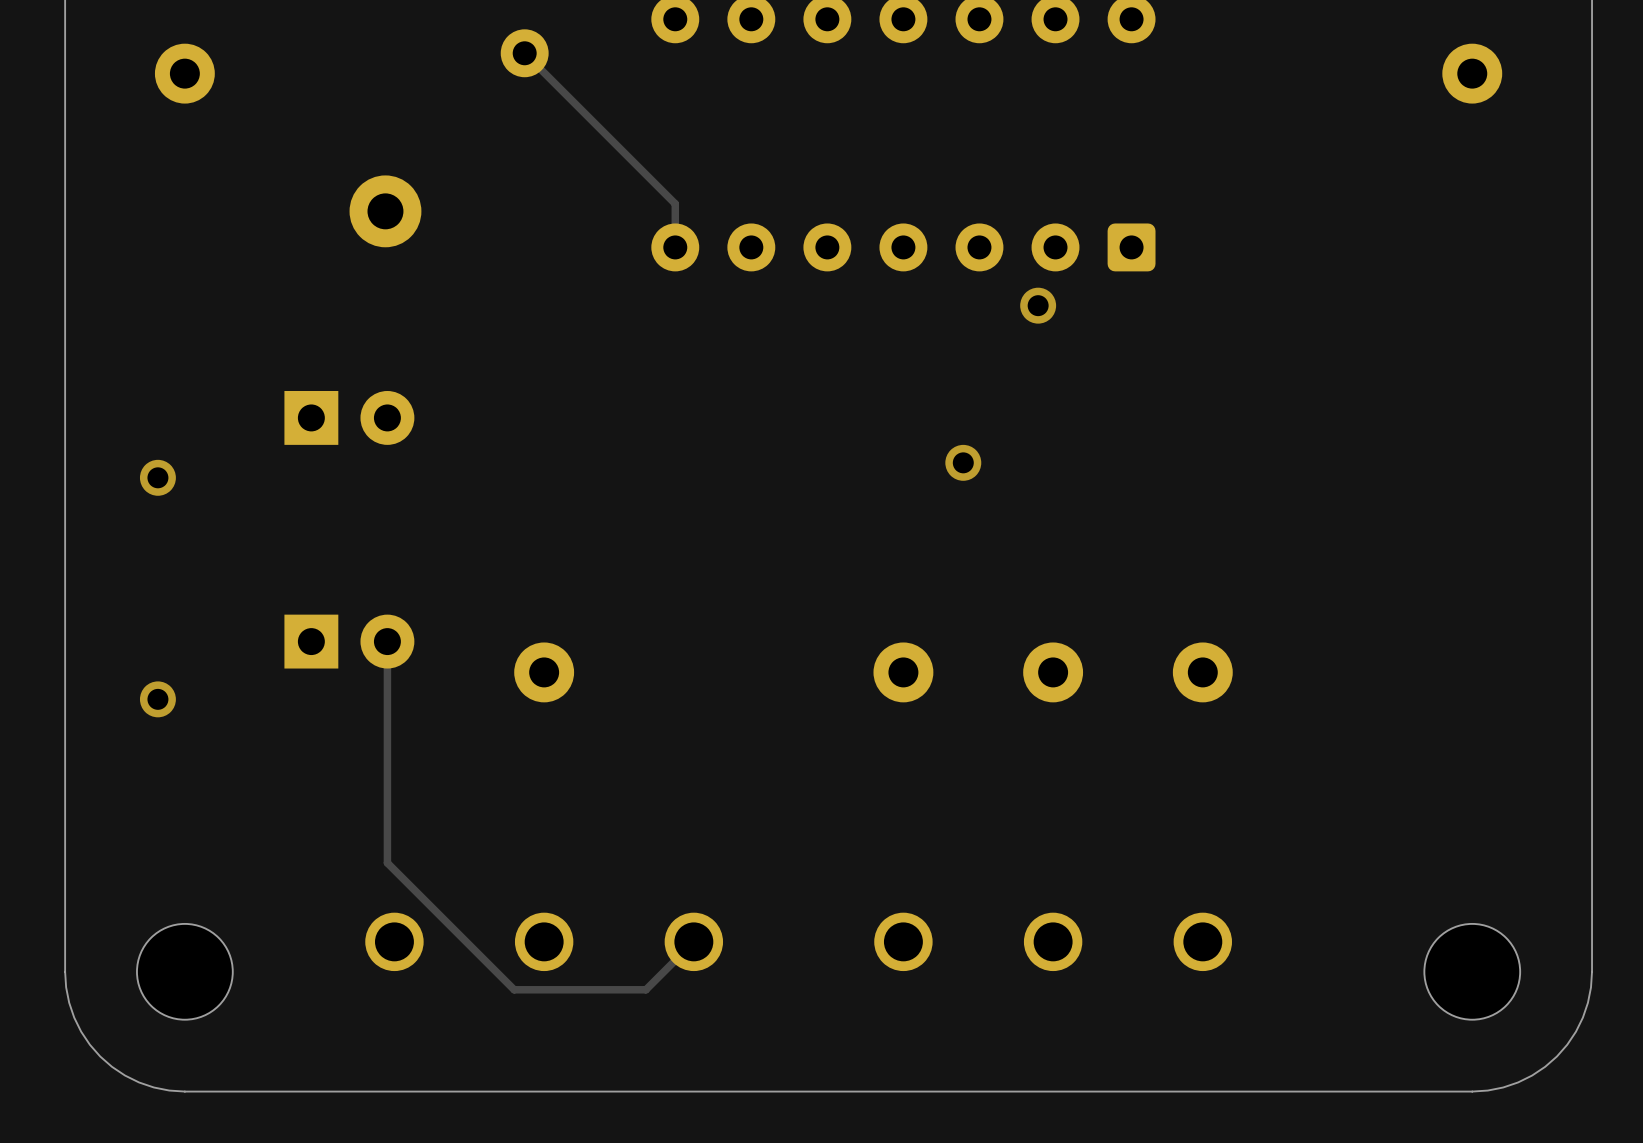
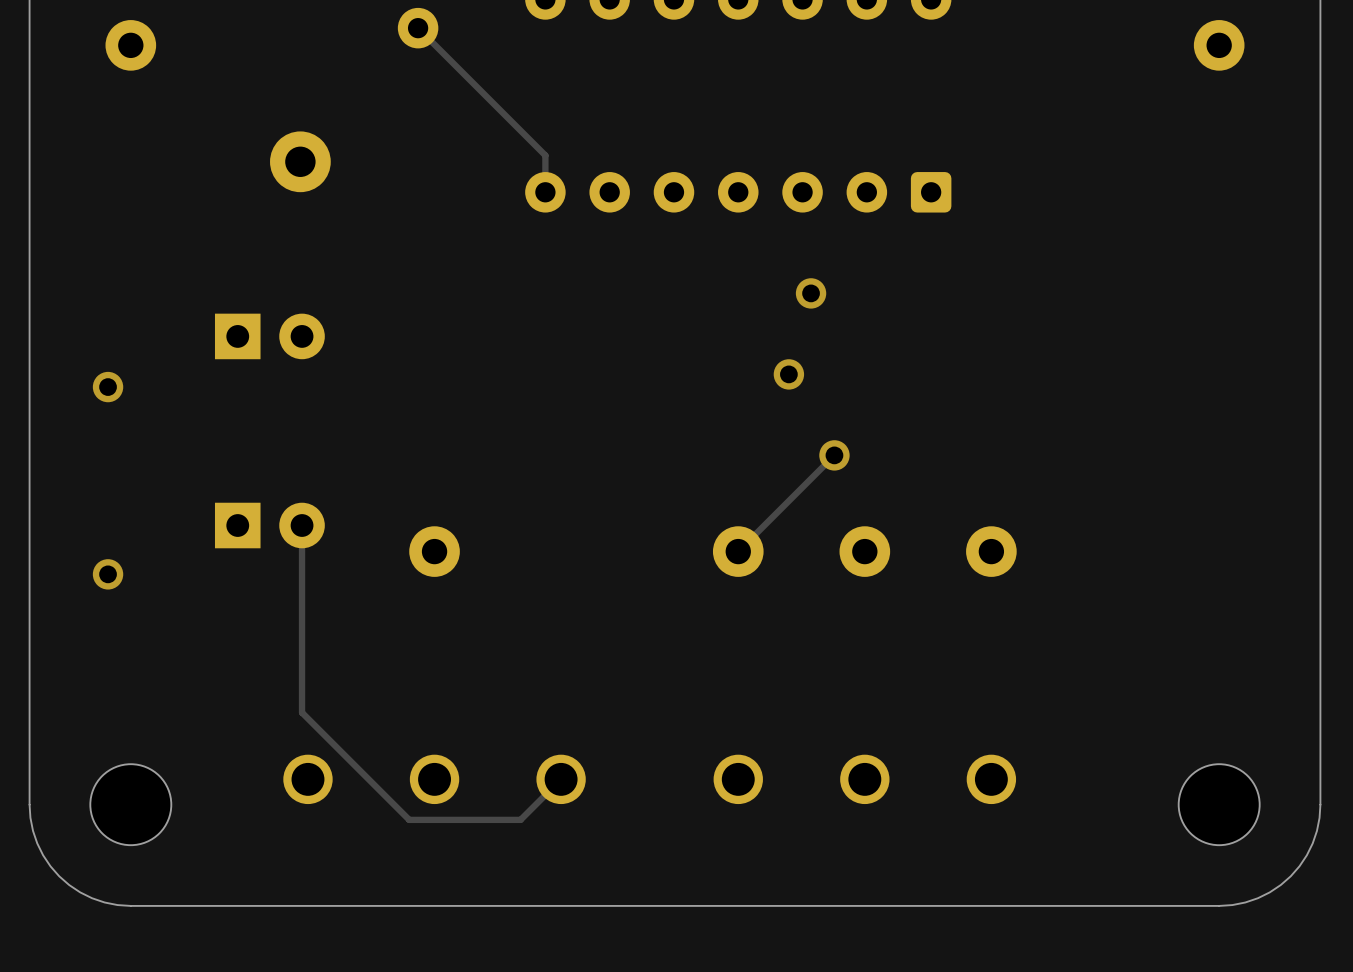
via position: (1038, 305) -> (811, 293)
track: none -> (834, 455) (738, 551)
via: none -> (834, 455)

